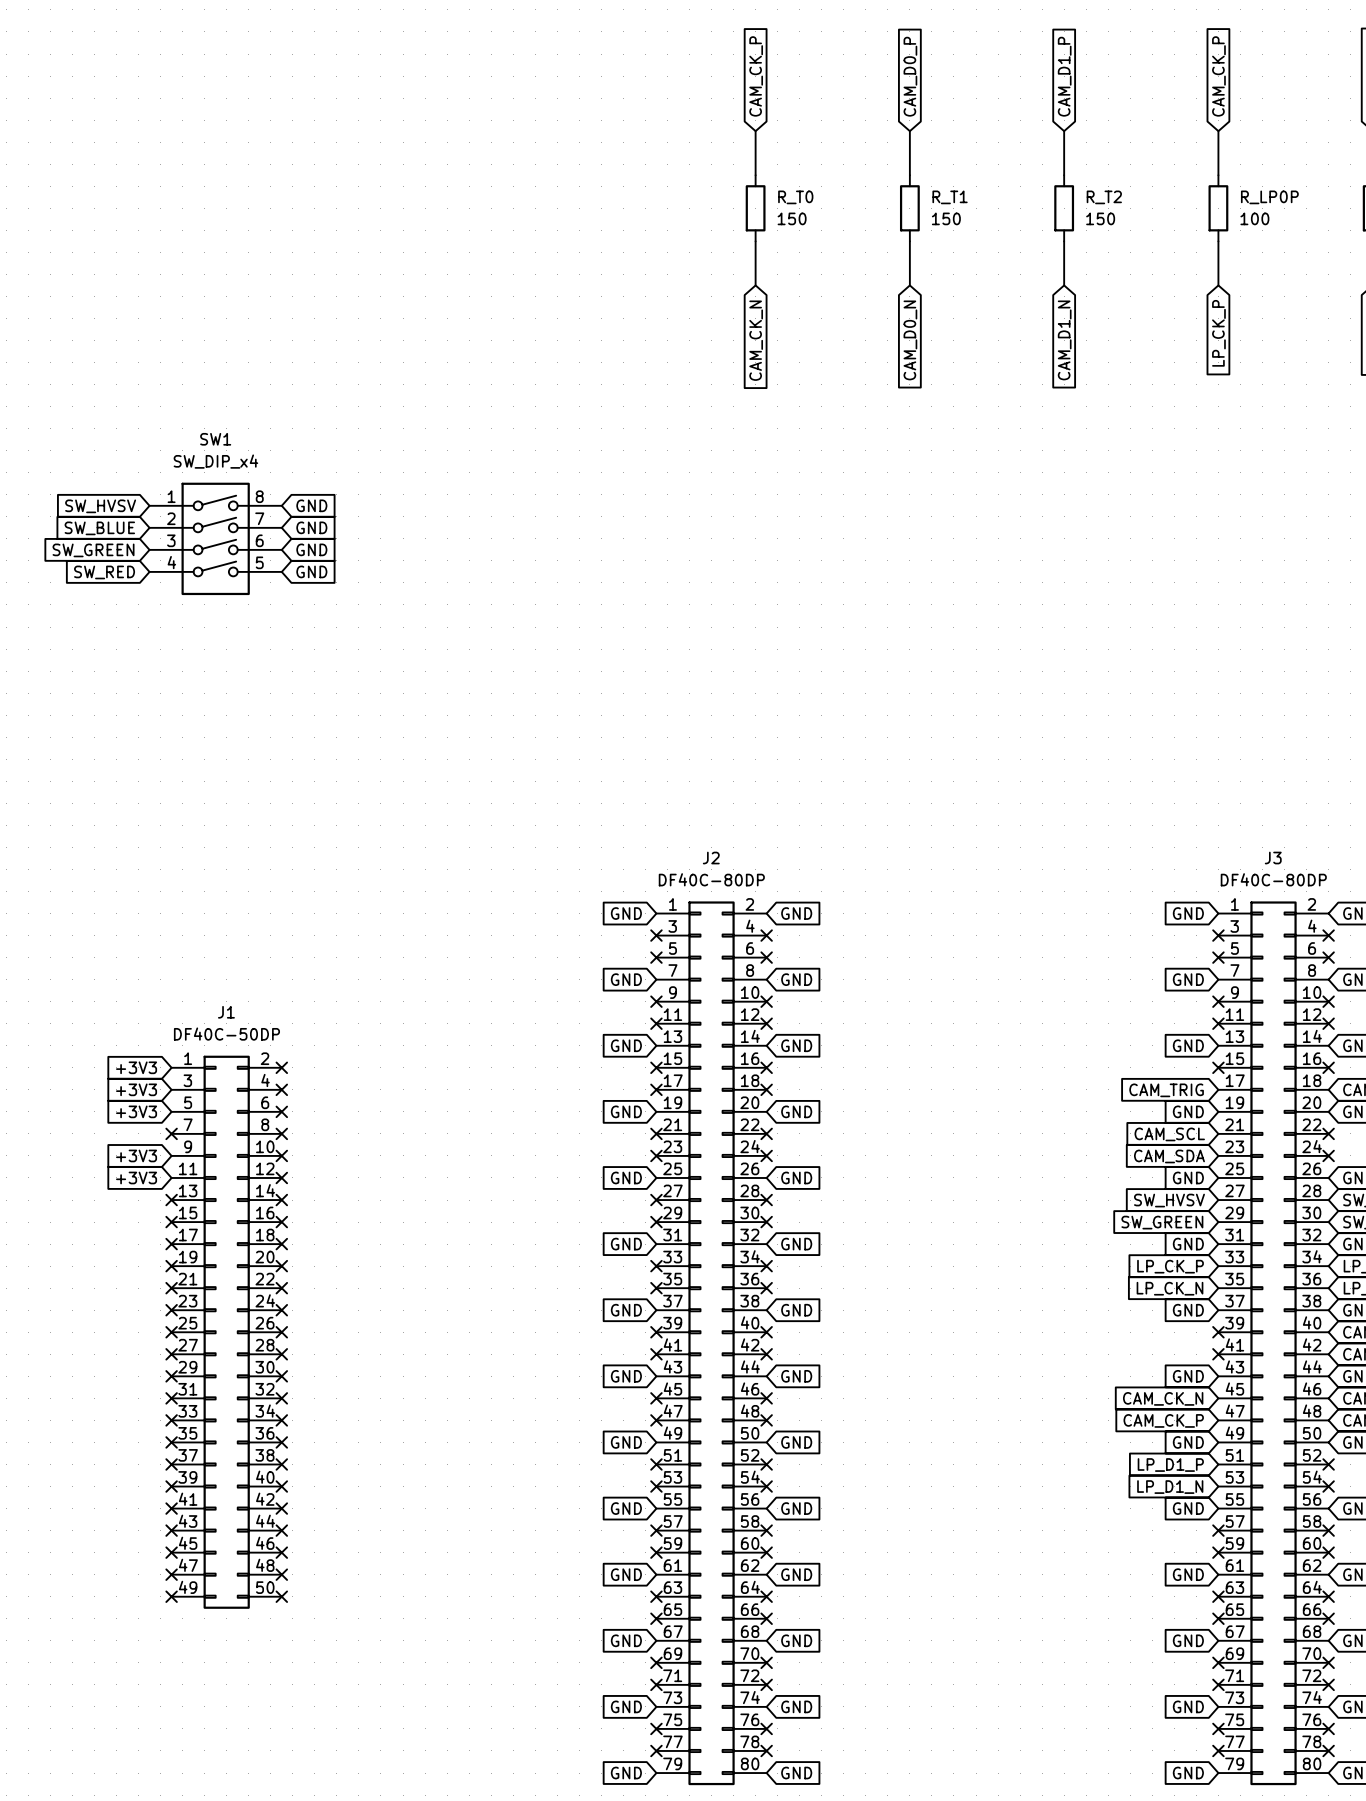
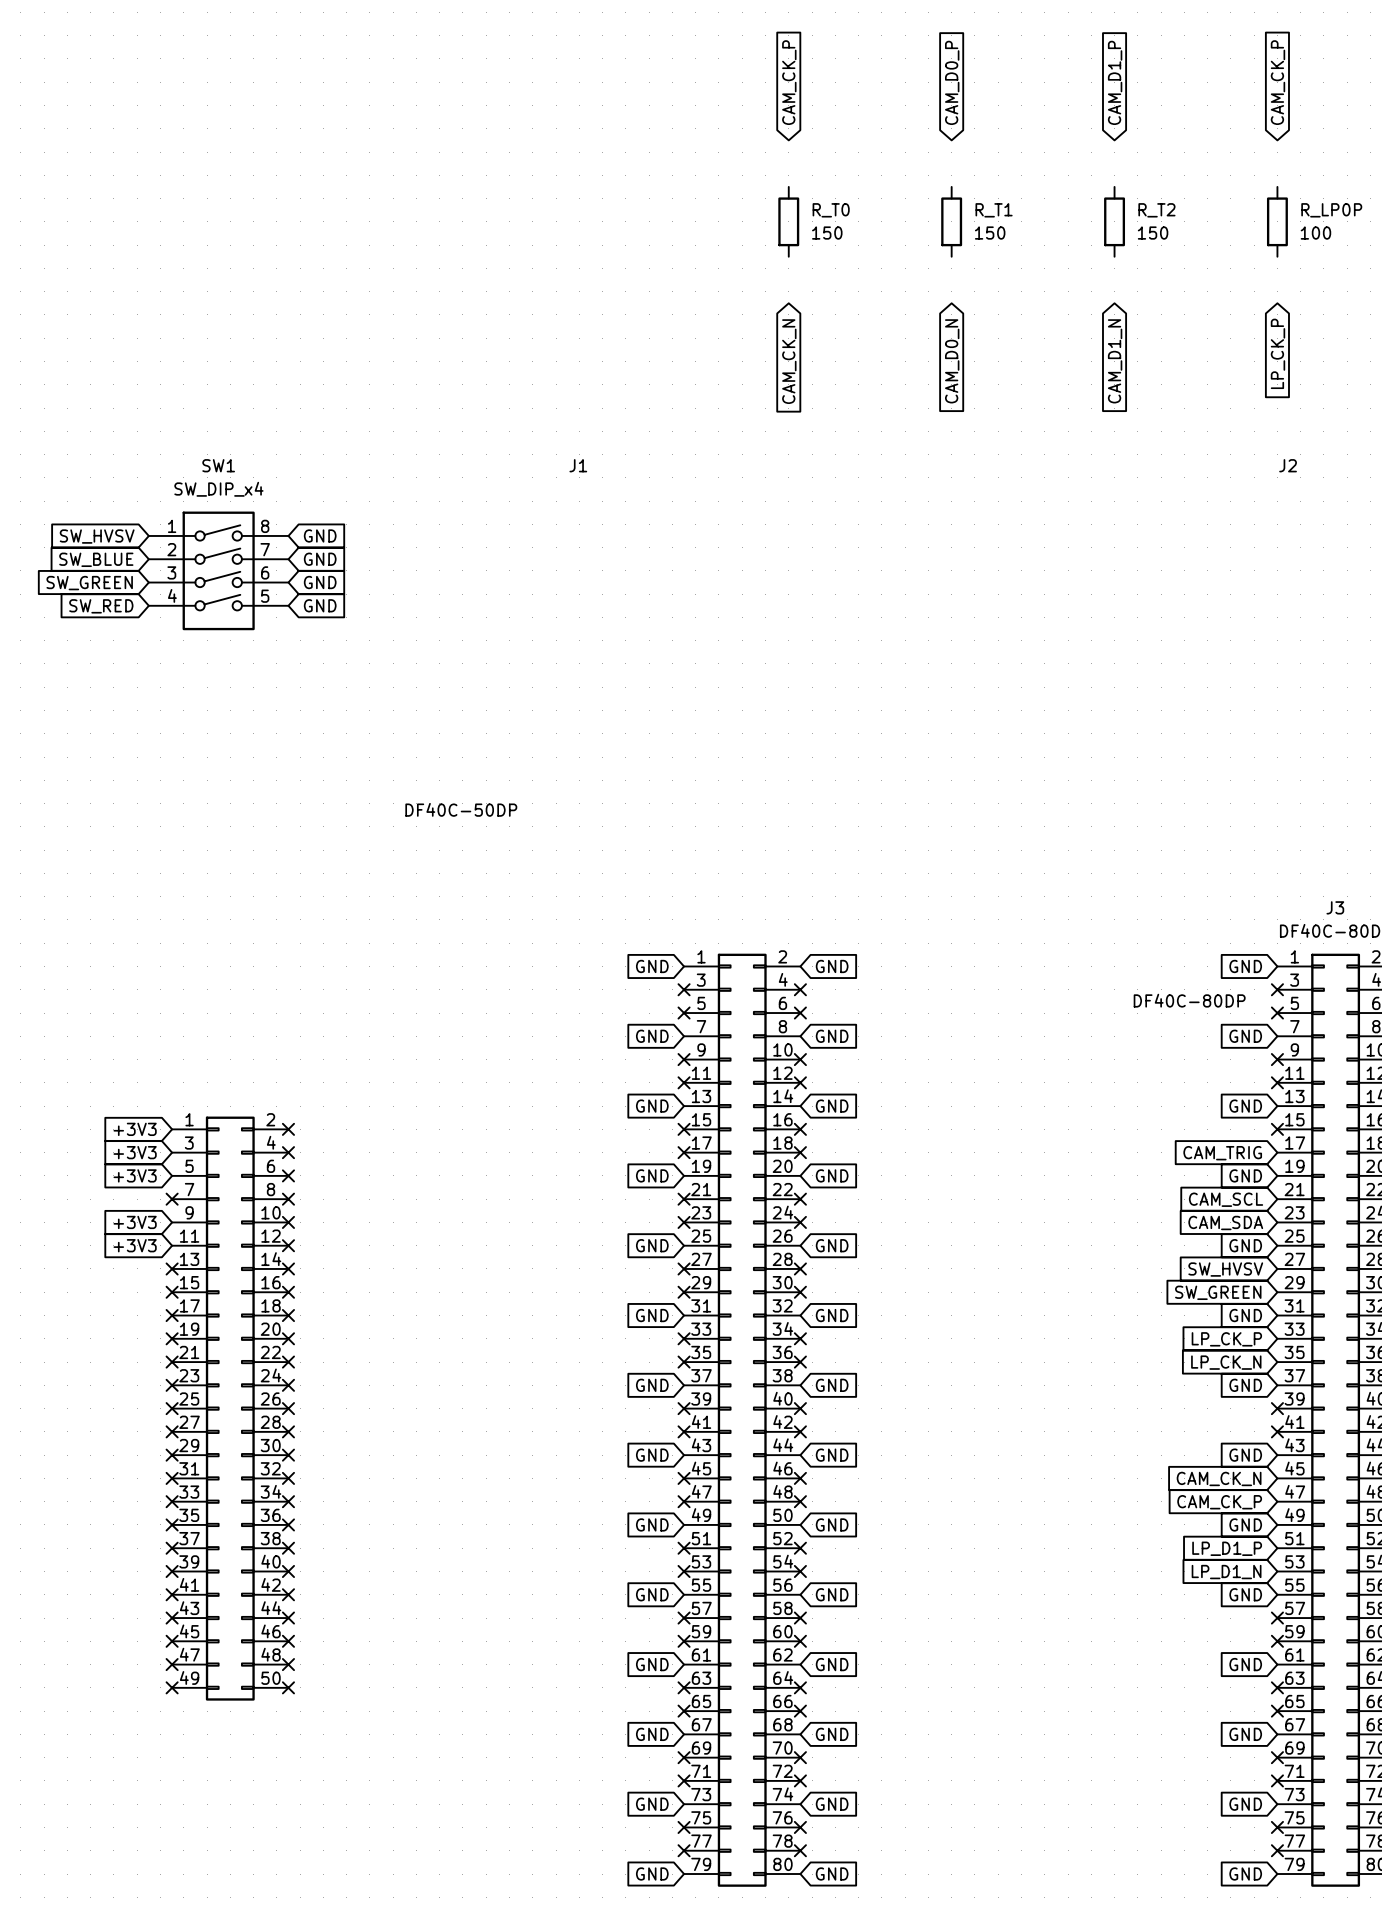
wire: (755, 131) (755, 175) -> none
wire: (909, 131) (909, 175) -> none
wire: (1064, 131) (1064, 175) -> none
wire: (1218, 131) (1218, 175) -> none
wire: (755, 241) (755, 285) -> none
wire: (909, 241) (909, 285) -> none
wire: (1064, 241) (1064, 285) -> none
wire: (1218, 241) (1218, 285) -> none
J2 name position: J2 (711, 858) -> J2 (1288, 465)
J2 value position: DF40C-80DP (711, 879) -> DF40C-80DP (1189, 1000)
J1 name position: J1 (226, 1012) -> J1 (578, 465)
J1 value position: DF40C-50DP (226, 1034) -> DF40C-50DP (461, 809)

